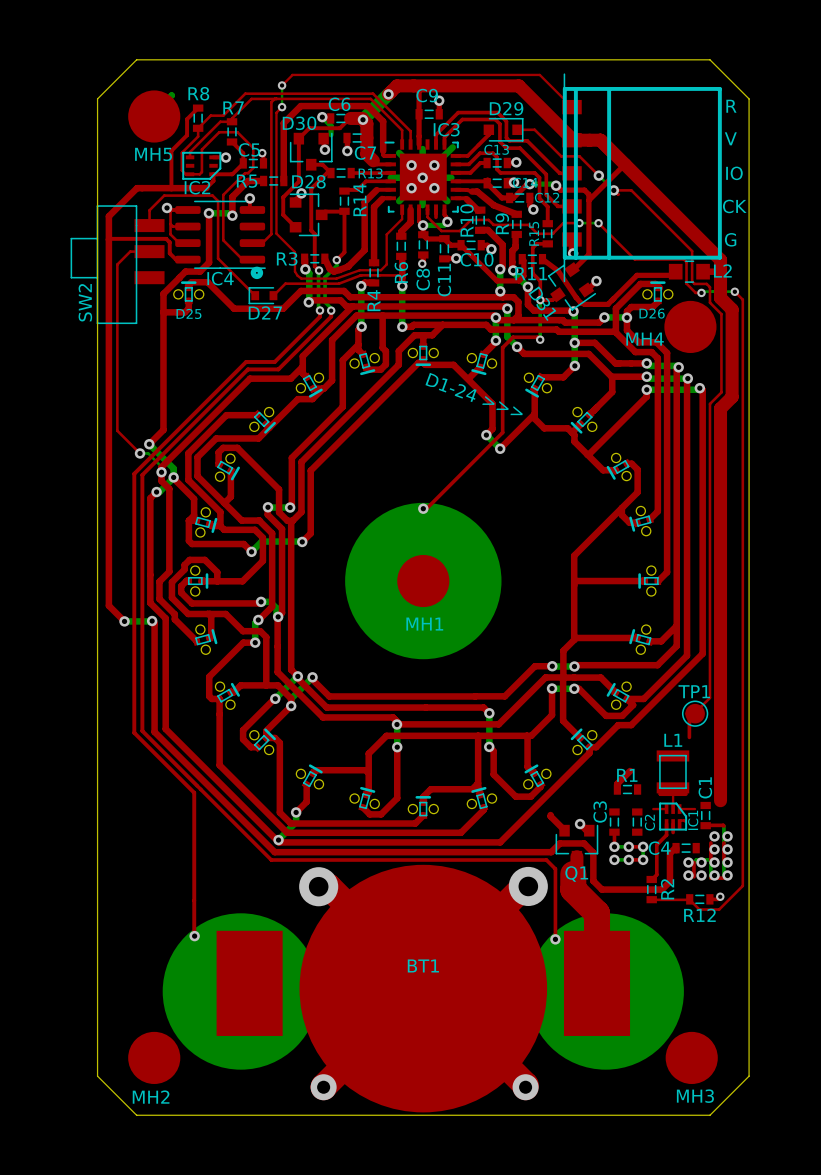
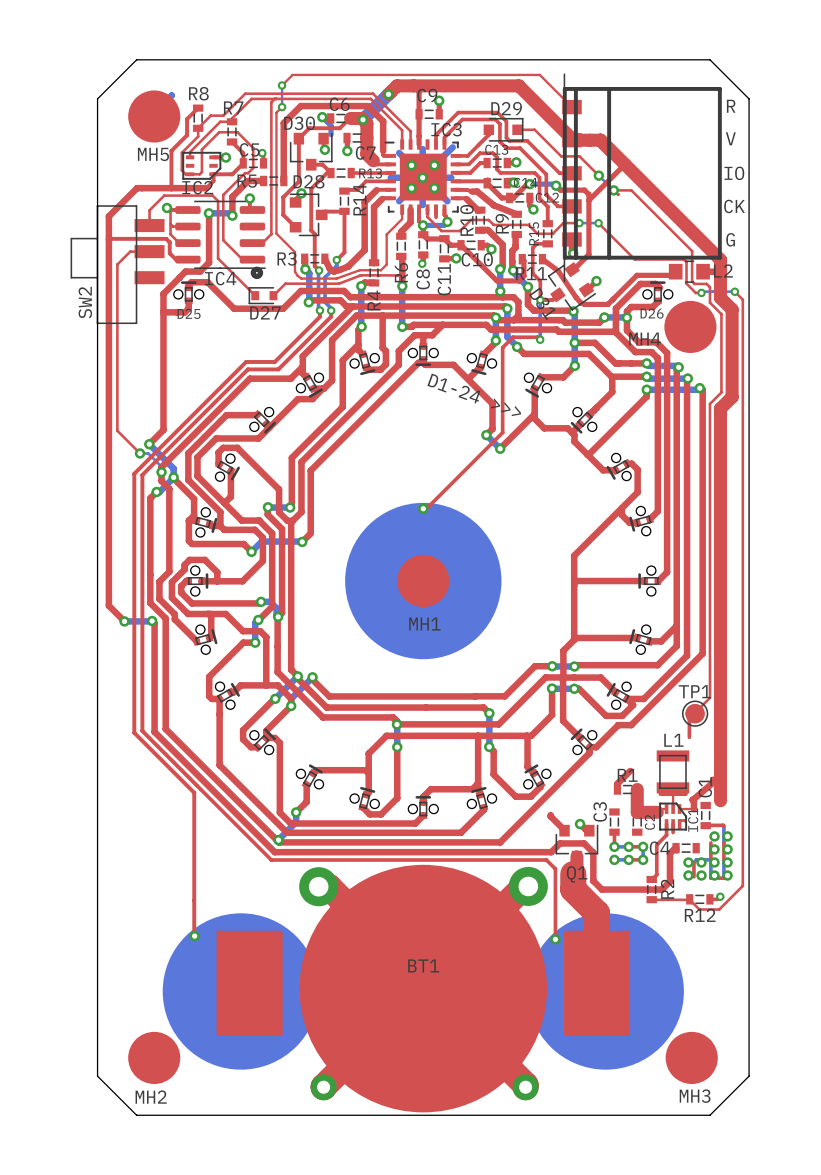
top track: none -> (713, 779) (715, 781) (692, 799) (693, 809)
top track: none -> (637, 792) (637, 789) (637, 812) (657, 812)

